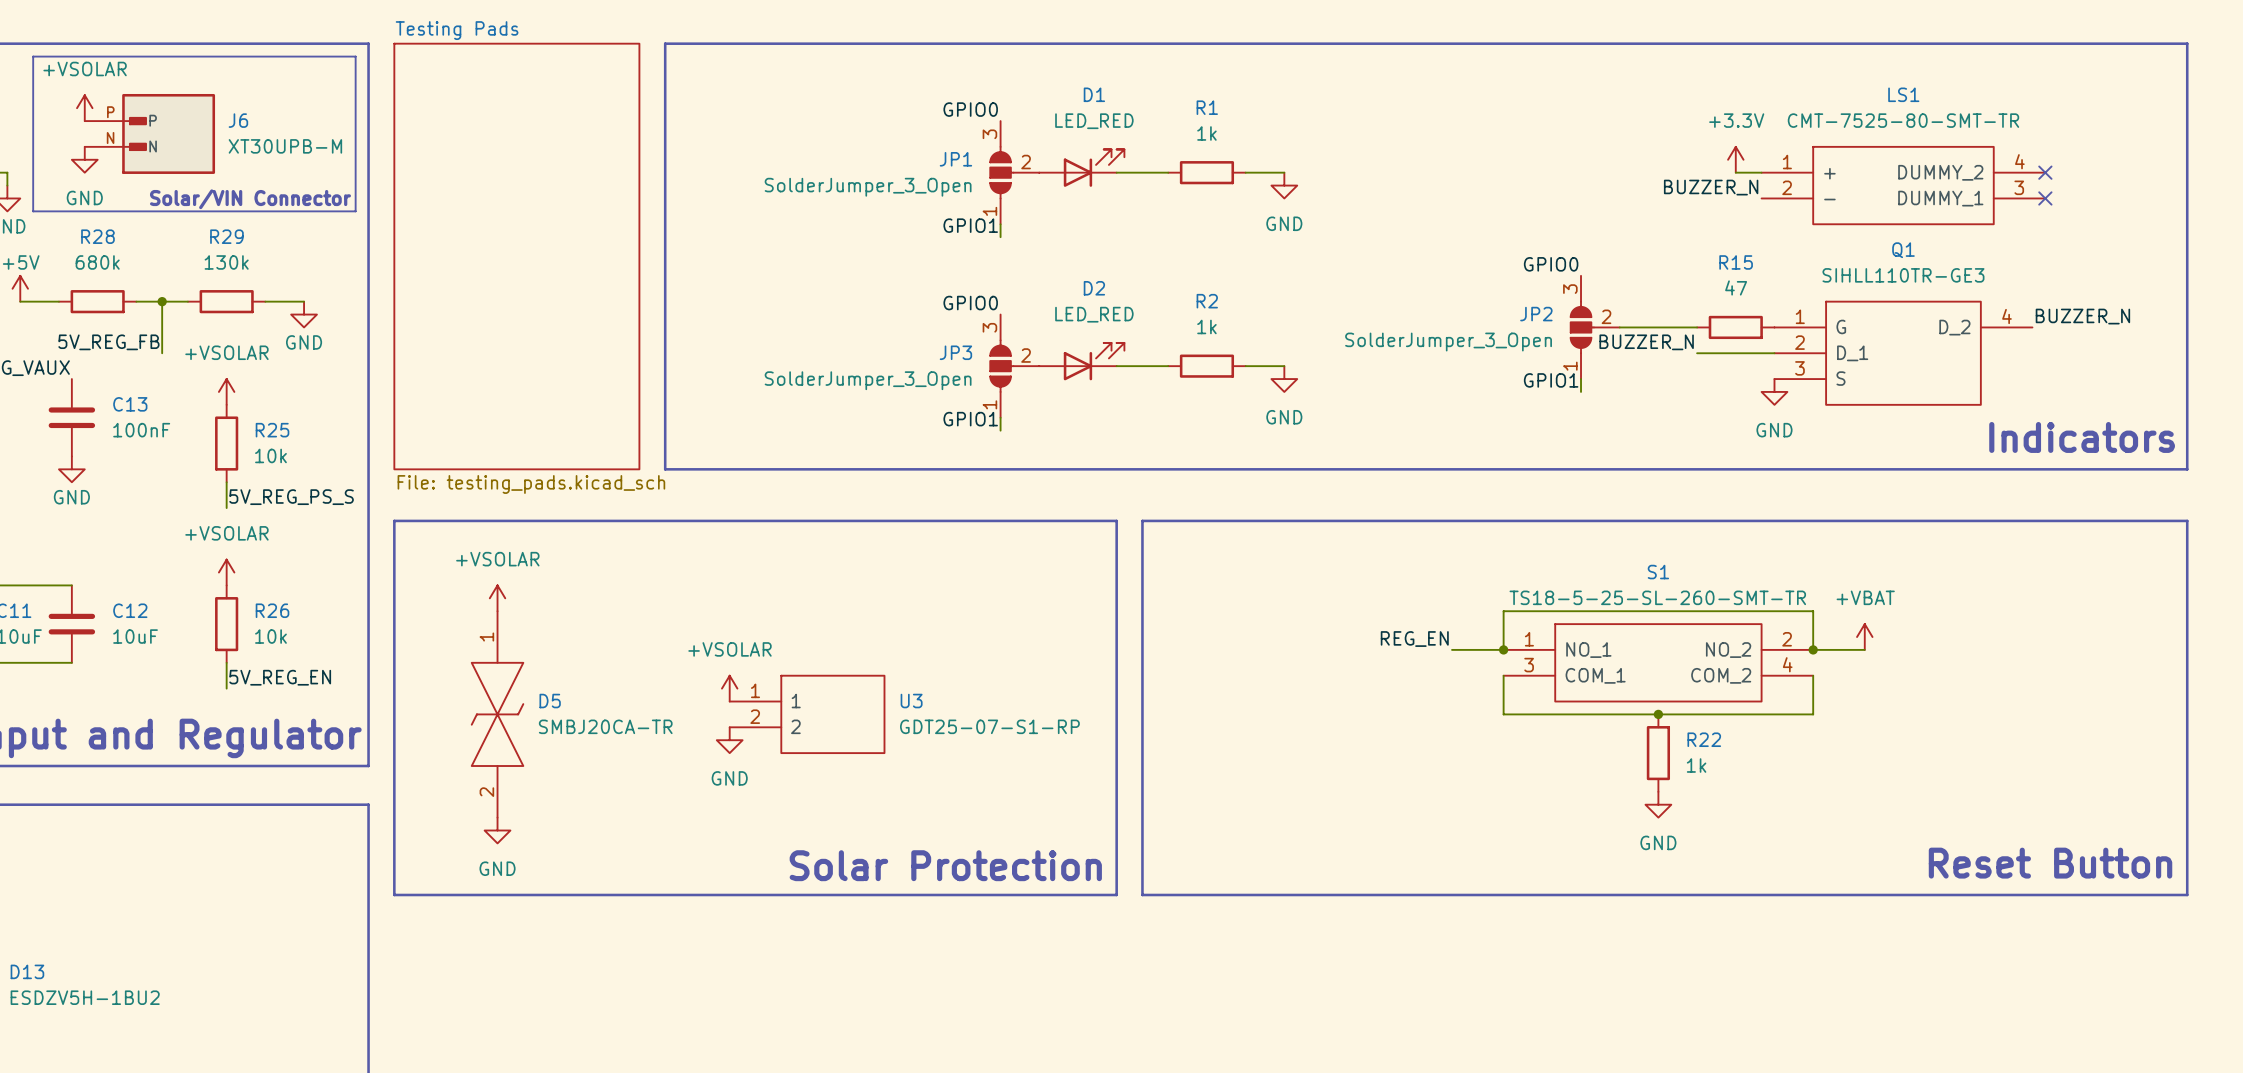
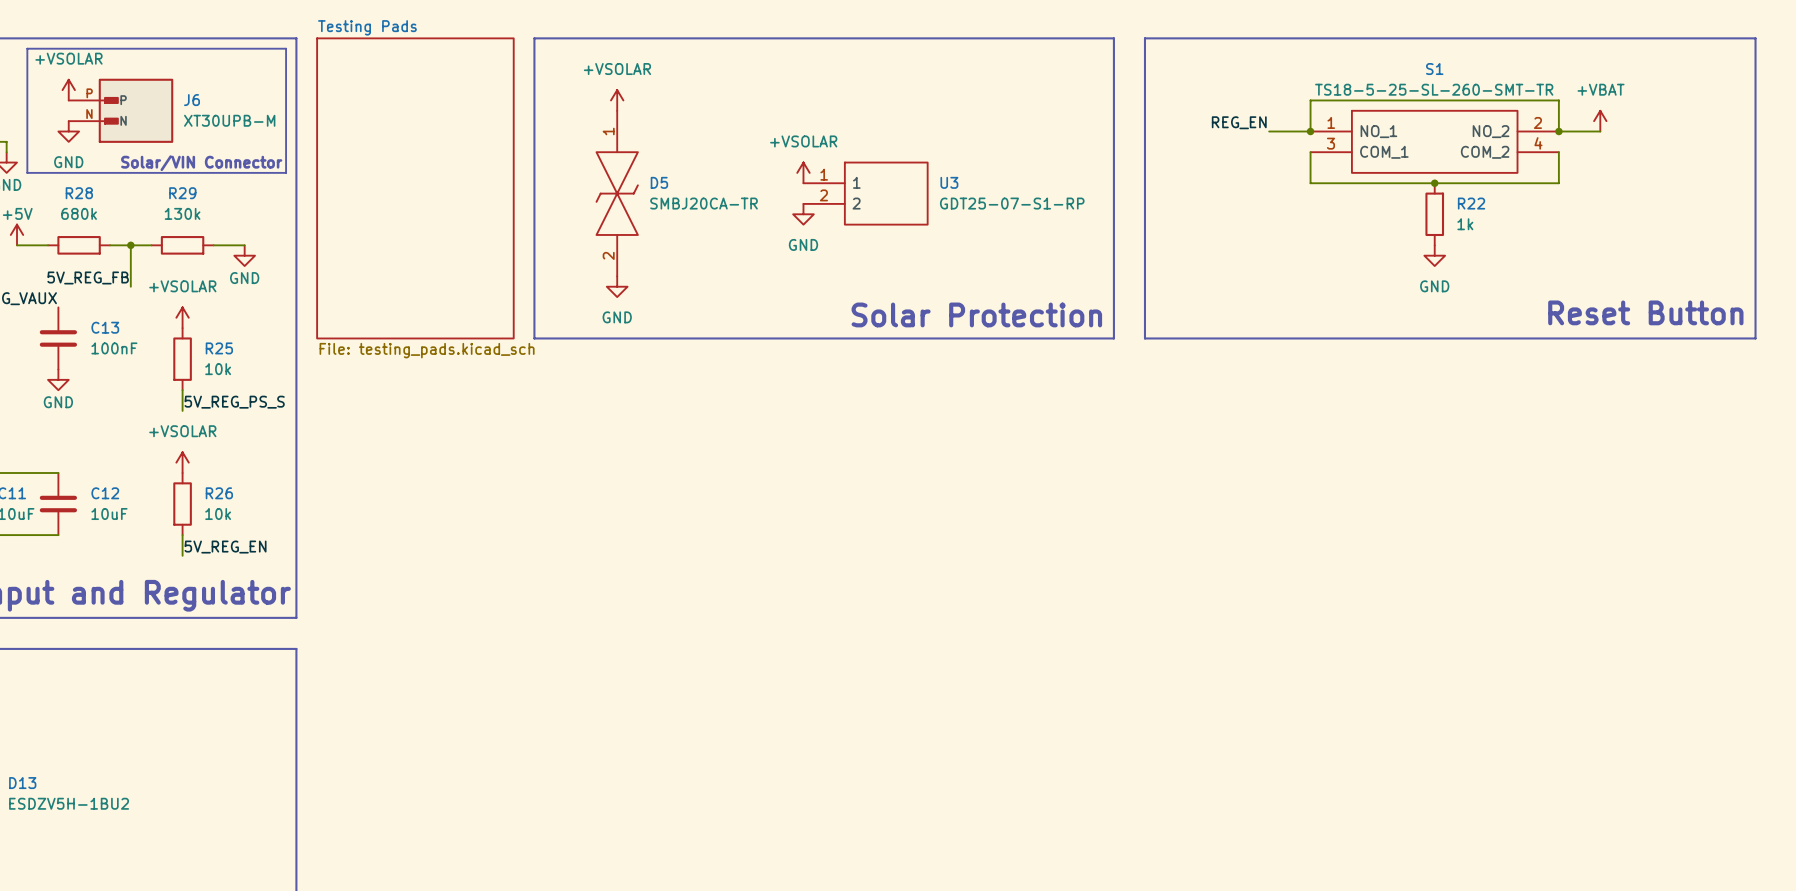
line: (1387, 43) (1426, 43) -> (1113, 38) (1113, 338) (534, 338)
label: GPIO0 (970, 109) -> none
power symbol: none -> +VSOLAR (617, 100)
power symbol: none -> +VBAT (1600, 121)
label: none -> REG_EN (1239, 122)
wire: none -> (1269, 131) (1310, 131) (1310, 100) (1558, 100) (1558, 131) (1600, 131)
junction: none -> (1310, 131)
power symbol: +3.3V (1735, 159) -> none
junction: none -> (1558, 131)
D1: LED_RED (1081, 168) -> none
JP1: SolderJumper_3_Open (1014, 172) -> none
wire: (1116, 172) (1168, 172) -> none
R1: 1k (1206, 172) -> none
wire: (1245, 172) (1284, 172) -> none
wire: (1735, 172) (1761, 172) -> none
no-connect mark: (2045, 172) -> none
power symbol: GND (1284, 185) -> none
wire: none -> (1310, 152) (1310, 183) (1558, 183) (1558, 152)
LS1: CMT-7525-80-SMT-TR (1903, 185) -> none
label: BUZZER_N (1711, 187) -> none
no-connect mark: (2045, 198) -> none
power symbol: none -> +VSOLAR (803, 172)
wire: (1000, 224) (1000, 237) -> none
junction: none -> (1434, 183)
label: GPIO1 (970, 225) -> none
sheet Testing Pads: none -> File: testing_pads.kicad_sch (415, 188)
sheet Testing Pads: File: testing_pads.kicad_sch (516, 256) -> none
power symbol: none -> GND (803, 214)
label: GPIO0 (1551, 264) -> none
label: GPIO0 (970, 303) -> none
label: BUZZER_N (2082, 316) -> none
JP2: SolderJumper_3_Open (1595, 327) -> none
wire: (1619, 327) (1697, 327) -> none
R15: 47 (1735, 327) -> none
label: BUZZER_N (1646, 342) -> none
power symbol: none -> GND (617, 286)
wire: (1697, 353) (1774, 353) -> none
Q1: SIHLL110TR-GE3 (1903, 353) -> none
D2: LED_RED (1081, 361) -> none
JP3: SolderJumper_3_Open (1014, 366) -> none
wire: (1116, 366) (1168, 366) -> none
R2: 1k (1206, 366) -> none
wire: (1245, 366) (1284, 366) -> none
power symbol: GND (1284, 379) -> none
wire: (1581, 379) (1581, 391) -> none
label: GPIO1 (1551, 380) -> none
text: none -> Reset Button (1645, 312)
text: none -> Solar Protection (976, 314)
power symbol position: GND (1774, 391) -> GND (1434, 255)
line: (665, 417) (665, 469) (2187, 469) (2187, 417) -> (1144, 38) (1144, 338) (1755, 338)
wire: (1000, 417) (1000, 430) -> none
label: GPIO1 (970, 419) -> none
text: Indicators (2082, 437) -> none
line: (394, 520) (1116, 520) (1116, 894) (394, 894) (394, 520) -> none
line: (1142, 520) (2187, 520) (2187, 894) (1142, 894) (1142, 520) -> none
power symbol: +VSOLAR (497, 598) -> none
power symbol: +VBAT (1864, 637) -> none
label: REG_EN (1414, 639) -> none
wire: (1452, 649) (1503, 649) (1503, 611) (1813, 611) (1813, 649) (1864, 649) -> none
junction: (1503, 649) -> none
junction: (1813, 649) -> none
S1 position: (1658, 662) -> (1434, 141)
wire: (1503, 675) (1503, 714) (1813, 714) (1813, 675) -> none
power symbol: +VSOLAR (729, 688) -> none
D5 position: (497, 714) -> (617, 193)
U3 position: (807, 714) -> (865, 193)
junction: (1658, 714) -> none
power symbol: GND (729, 740) -> none
R22 position: (1658, 753) -> (1434, 214)
power symbol: GND (1658, 804) -> none
power symbol: GND (497, 830) -> none
text: Reset Button (2050, 863) -> none
text: Solar Protection (945, 865) -> none

